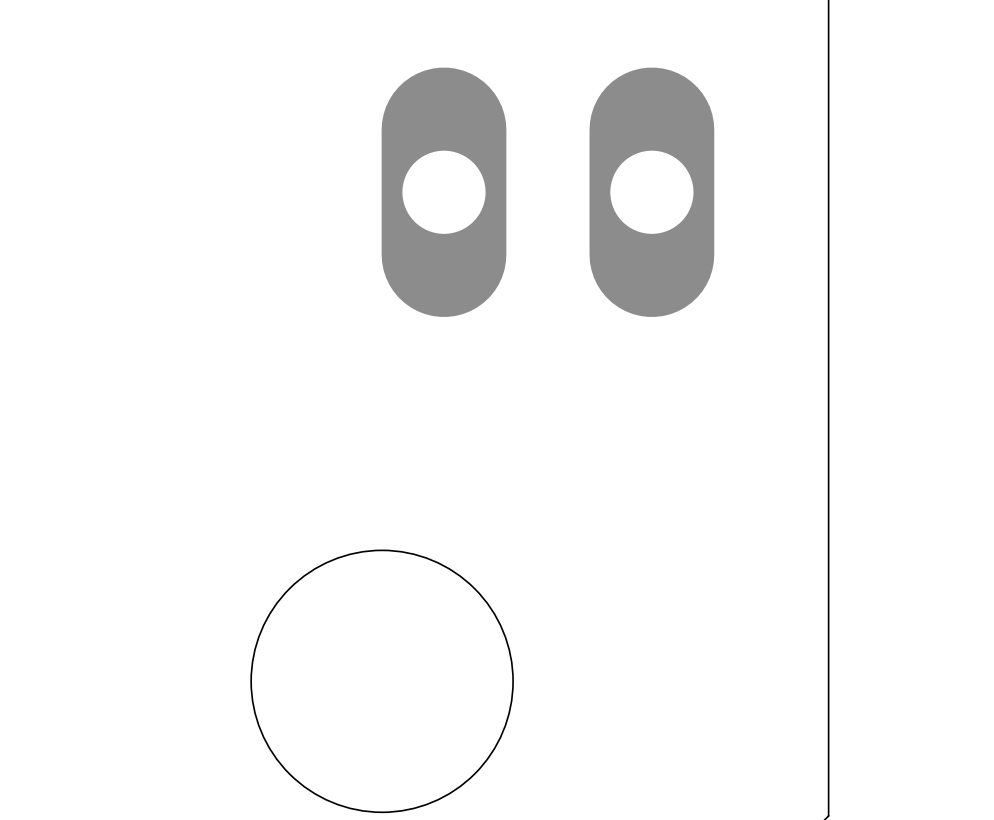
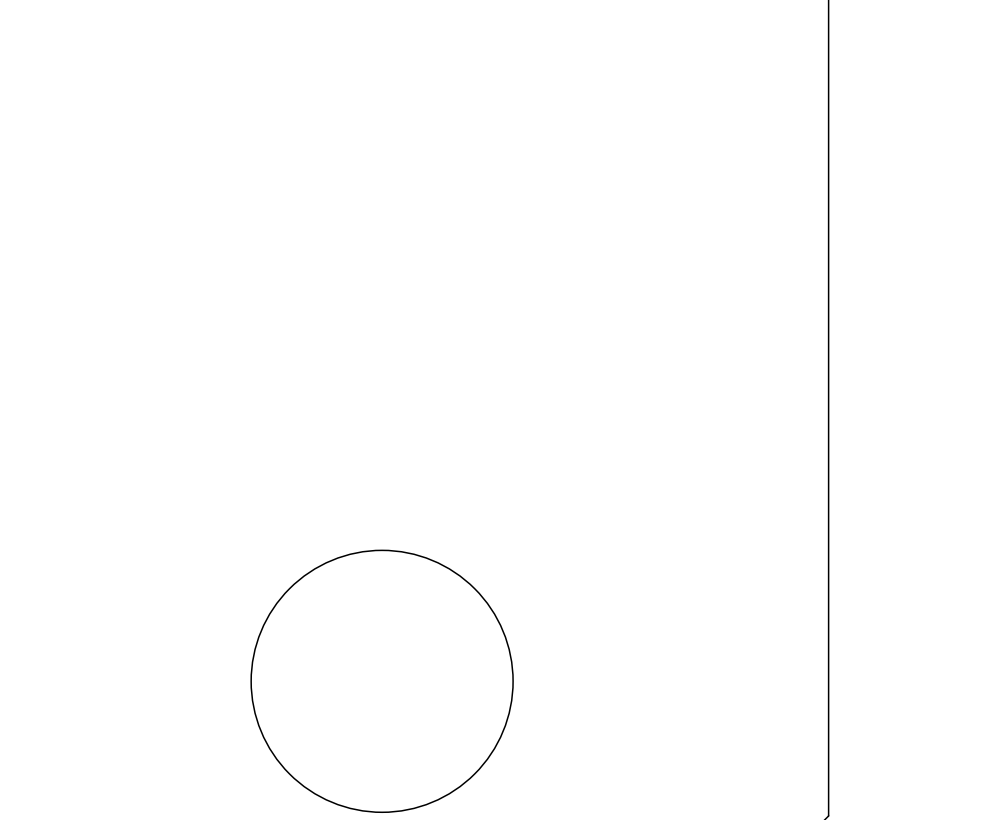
part: (547, 192) -> none

